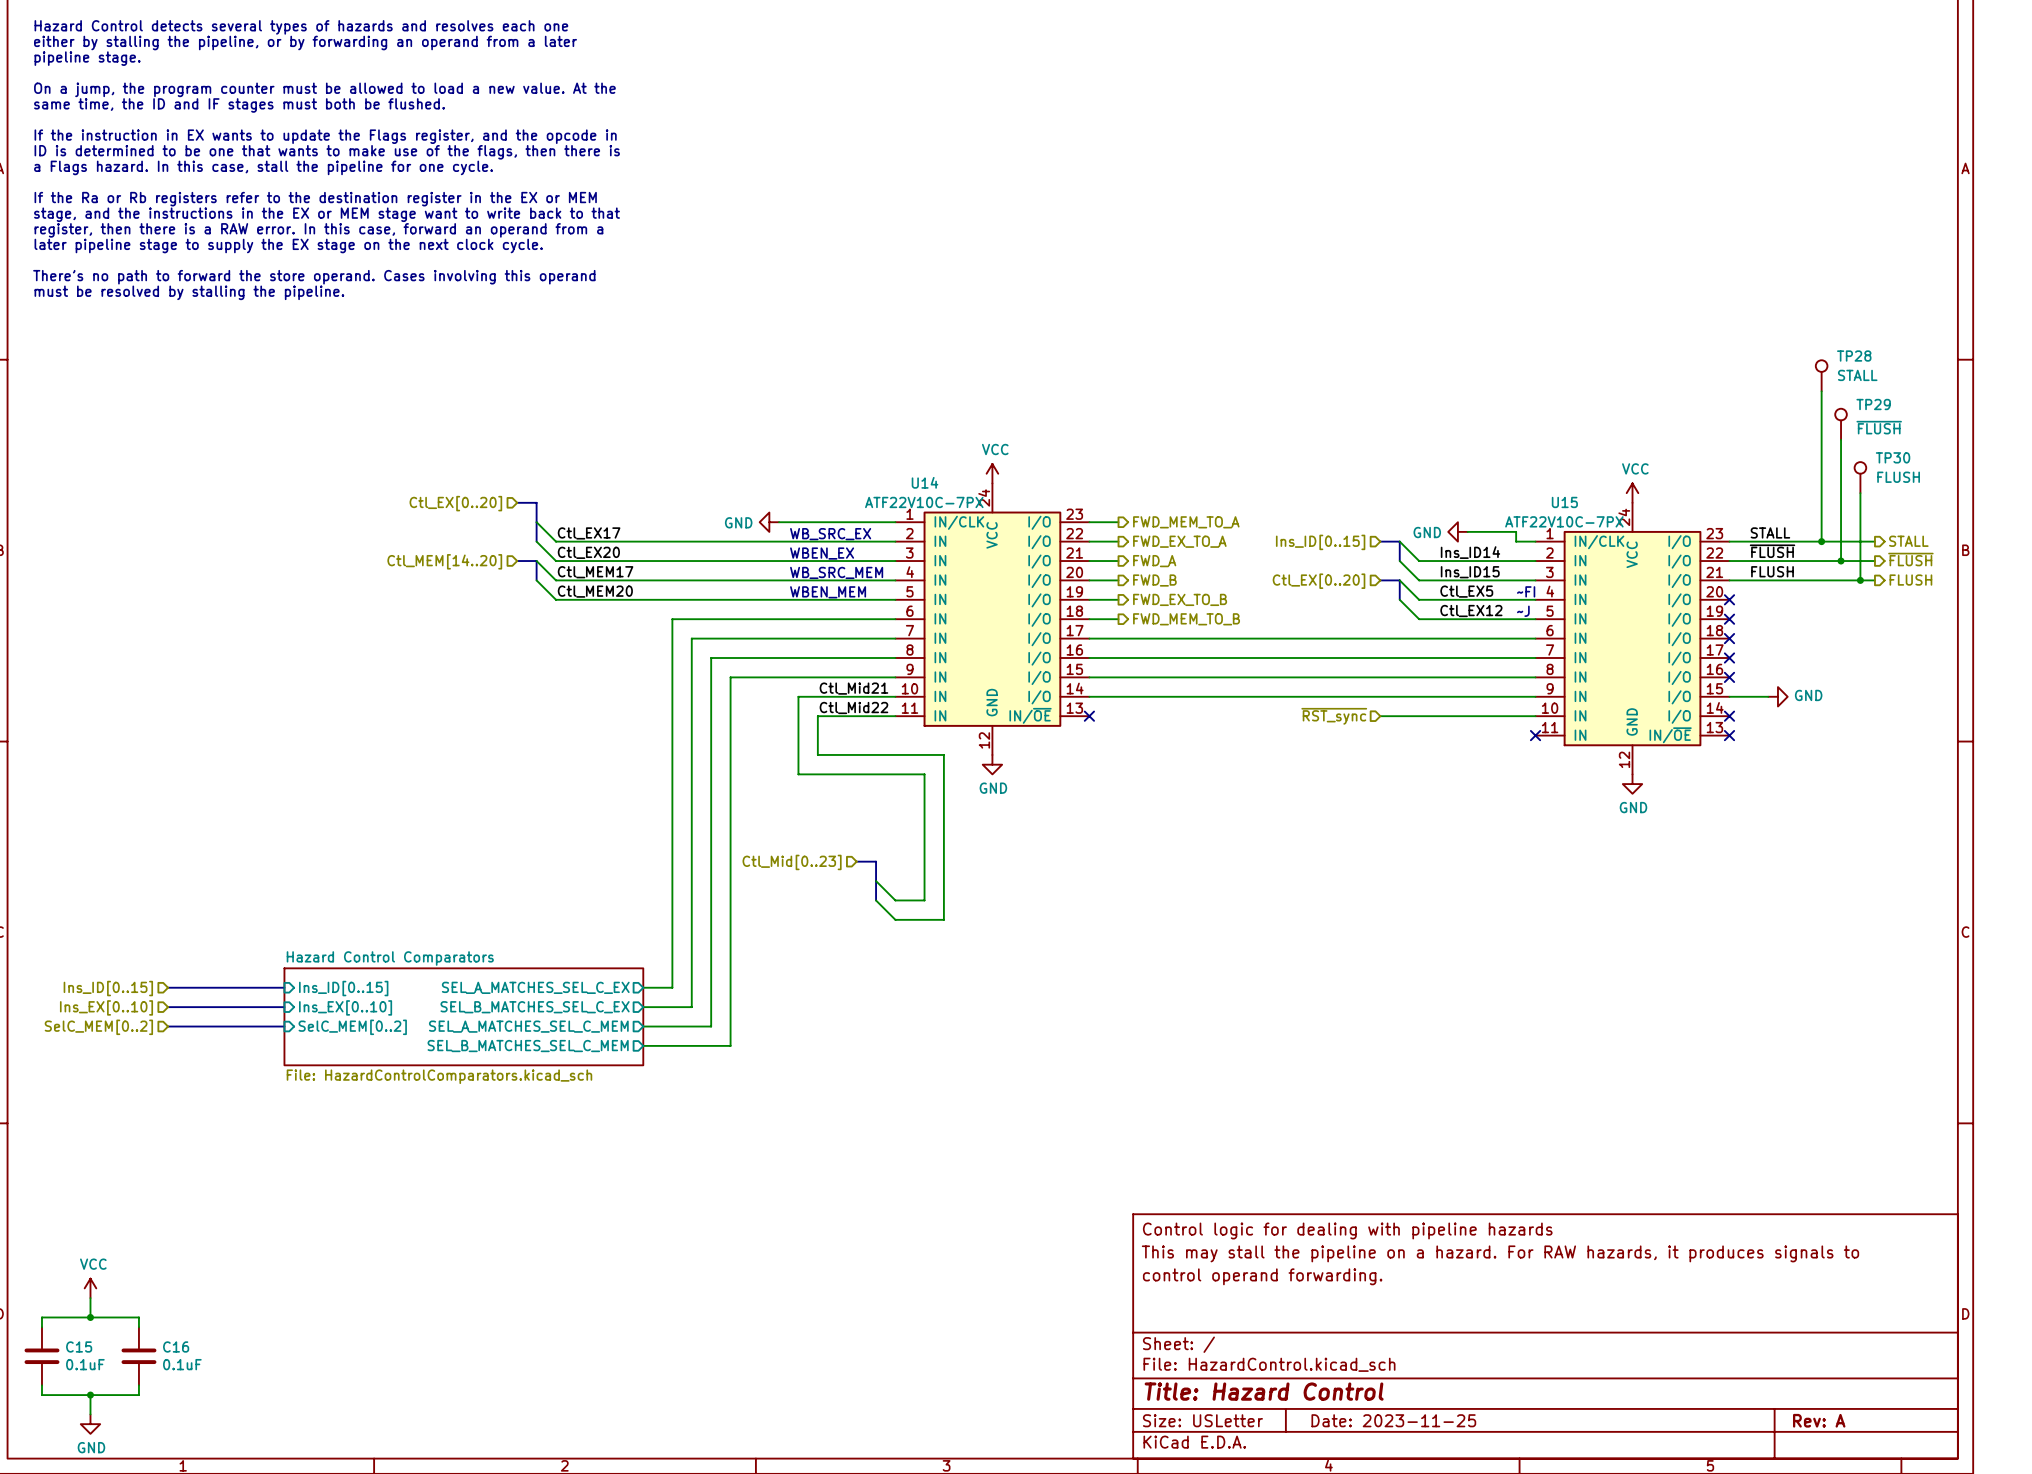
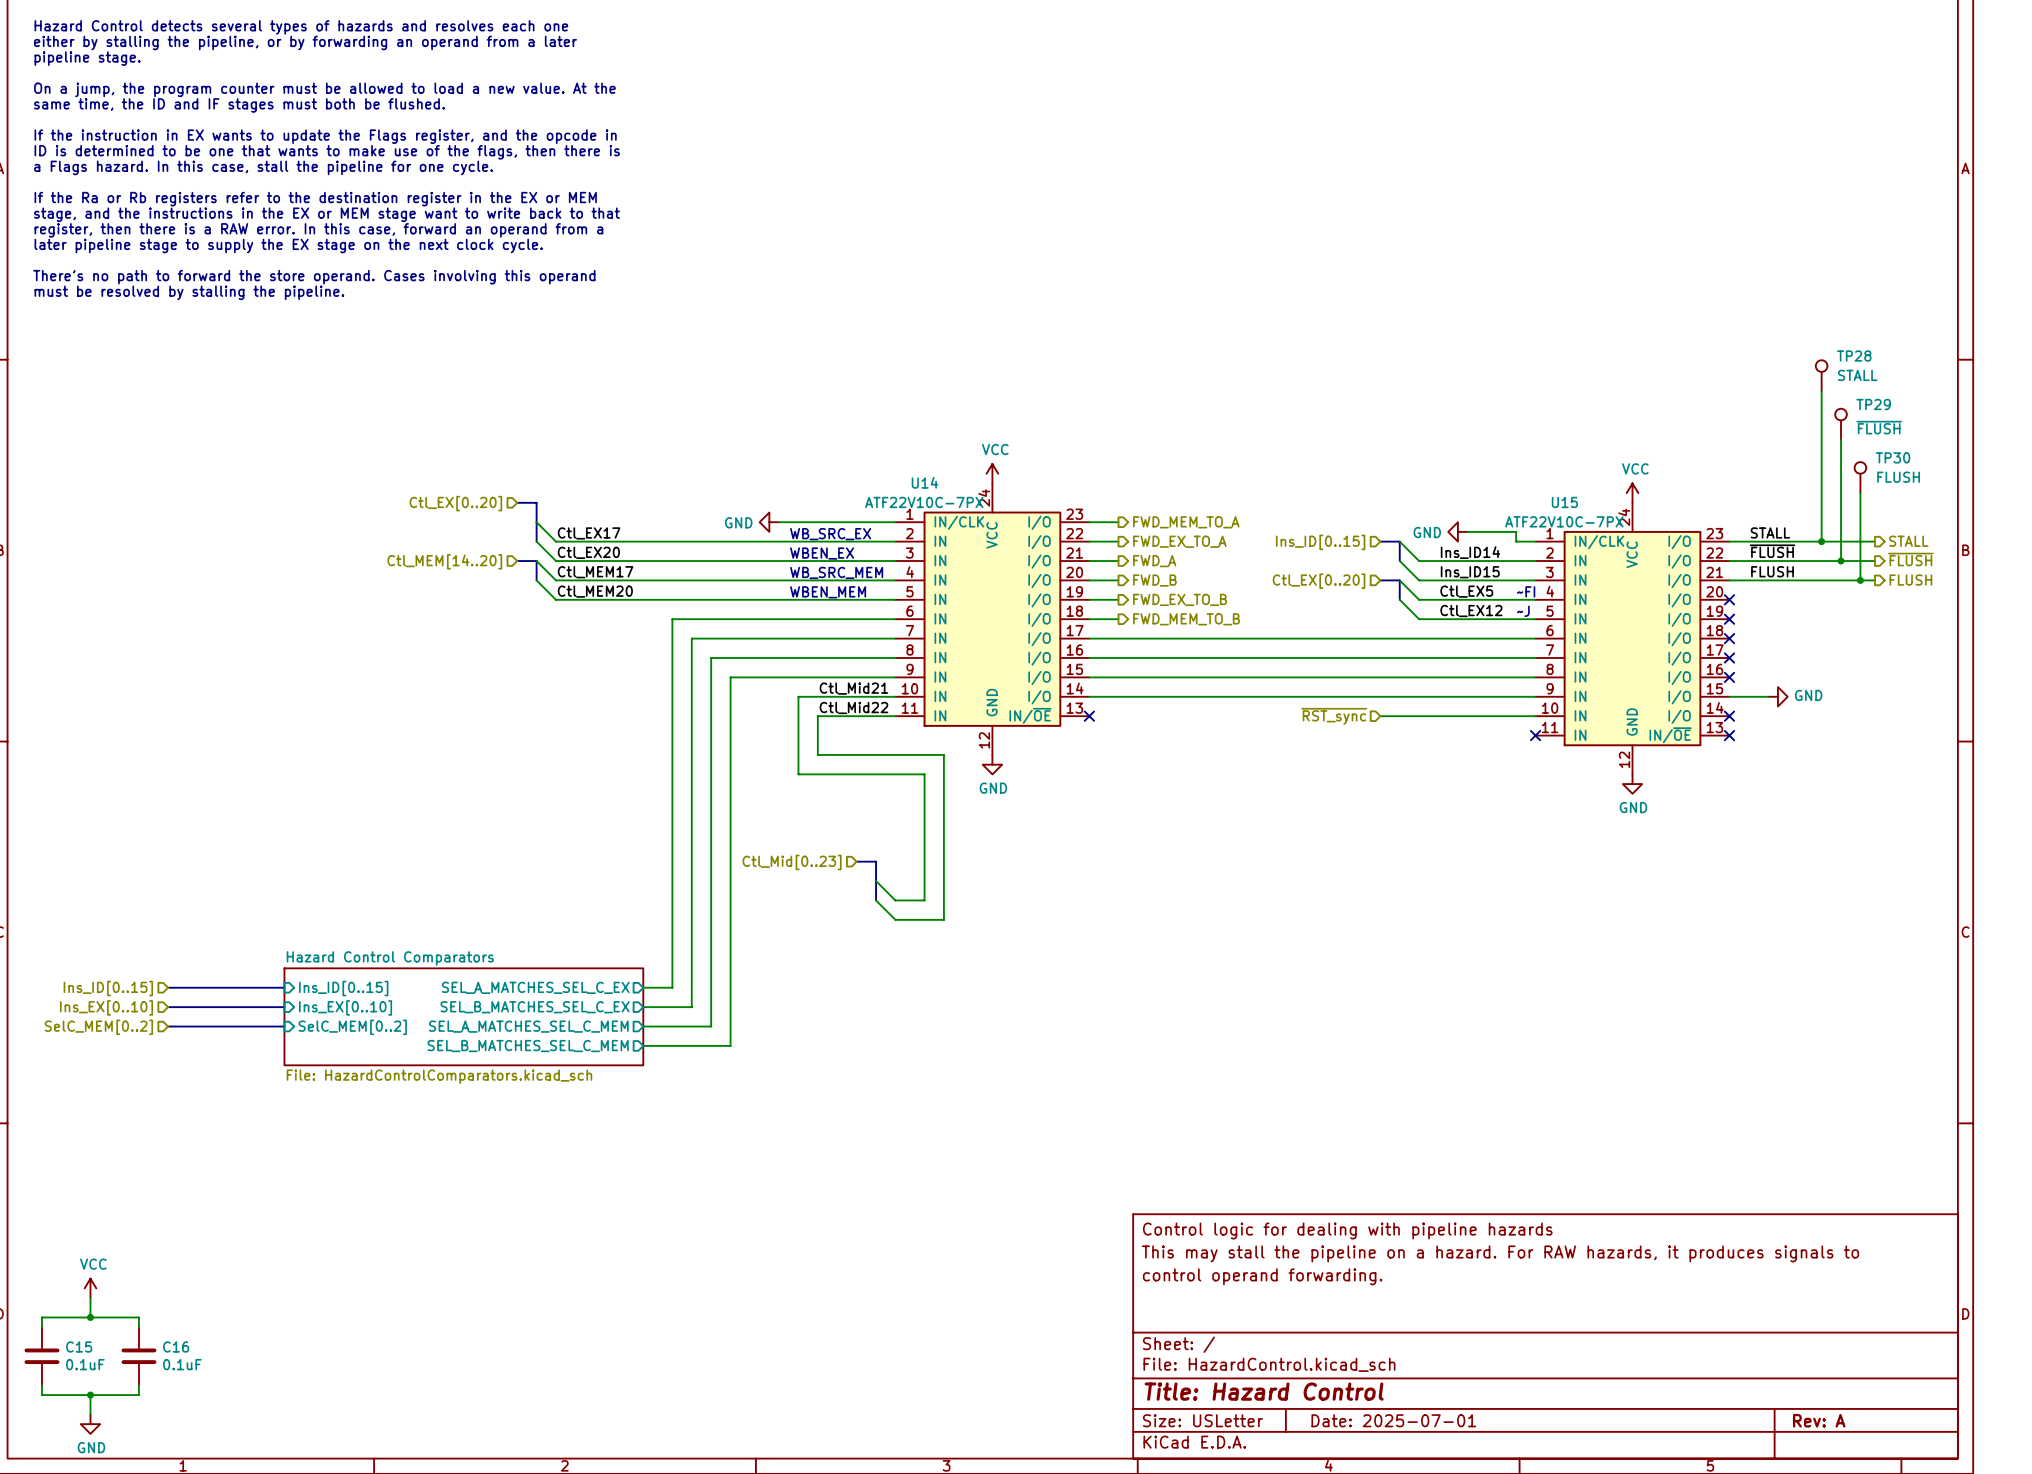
title block: Date: 2023-11-25 (1393, 1420) -> Date: 2025-07-01 (1393, 1420)

